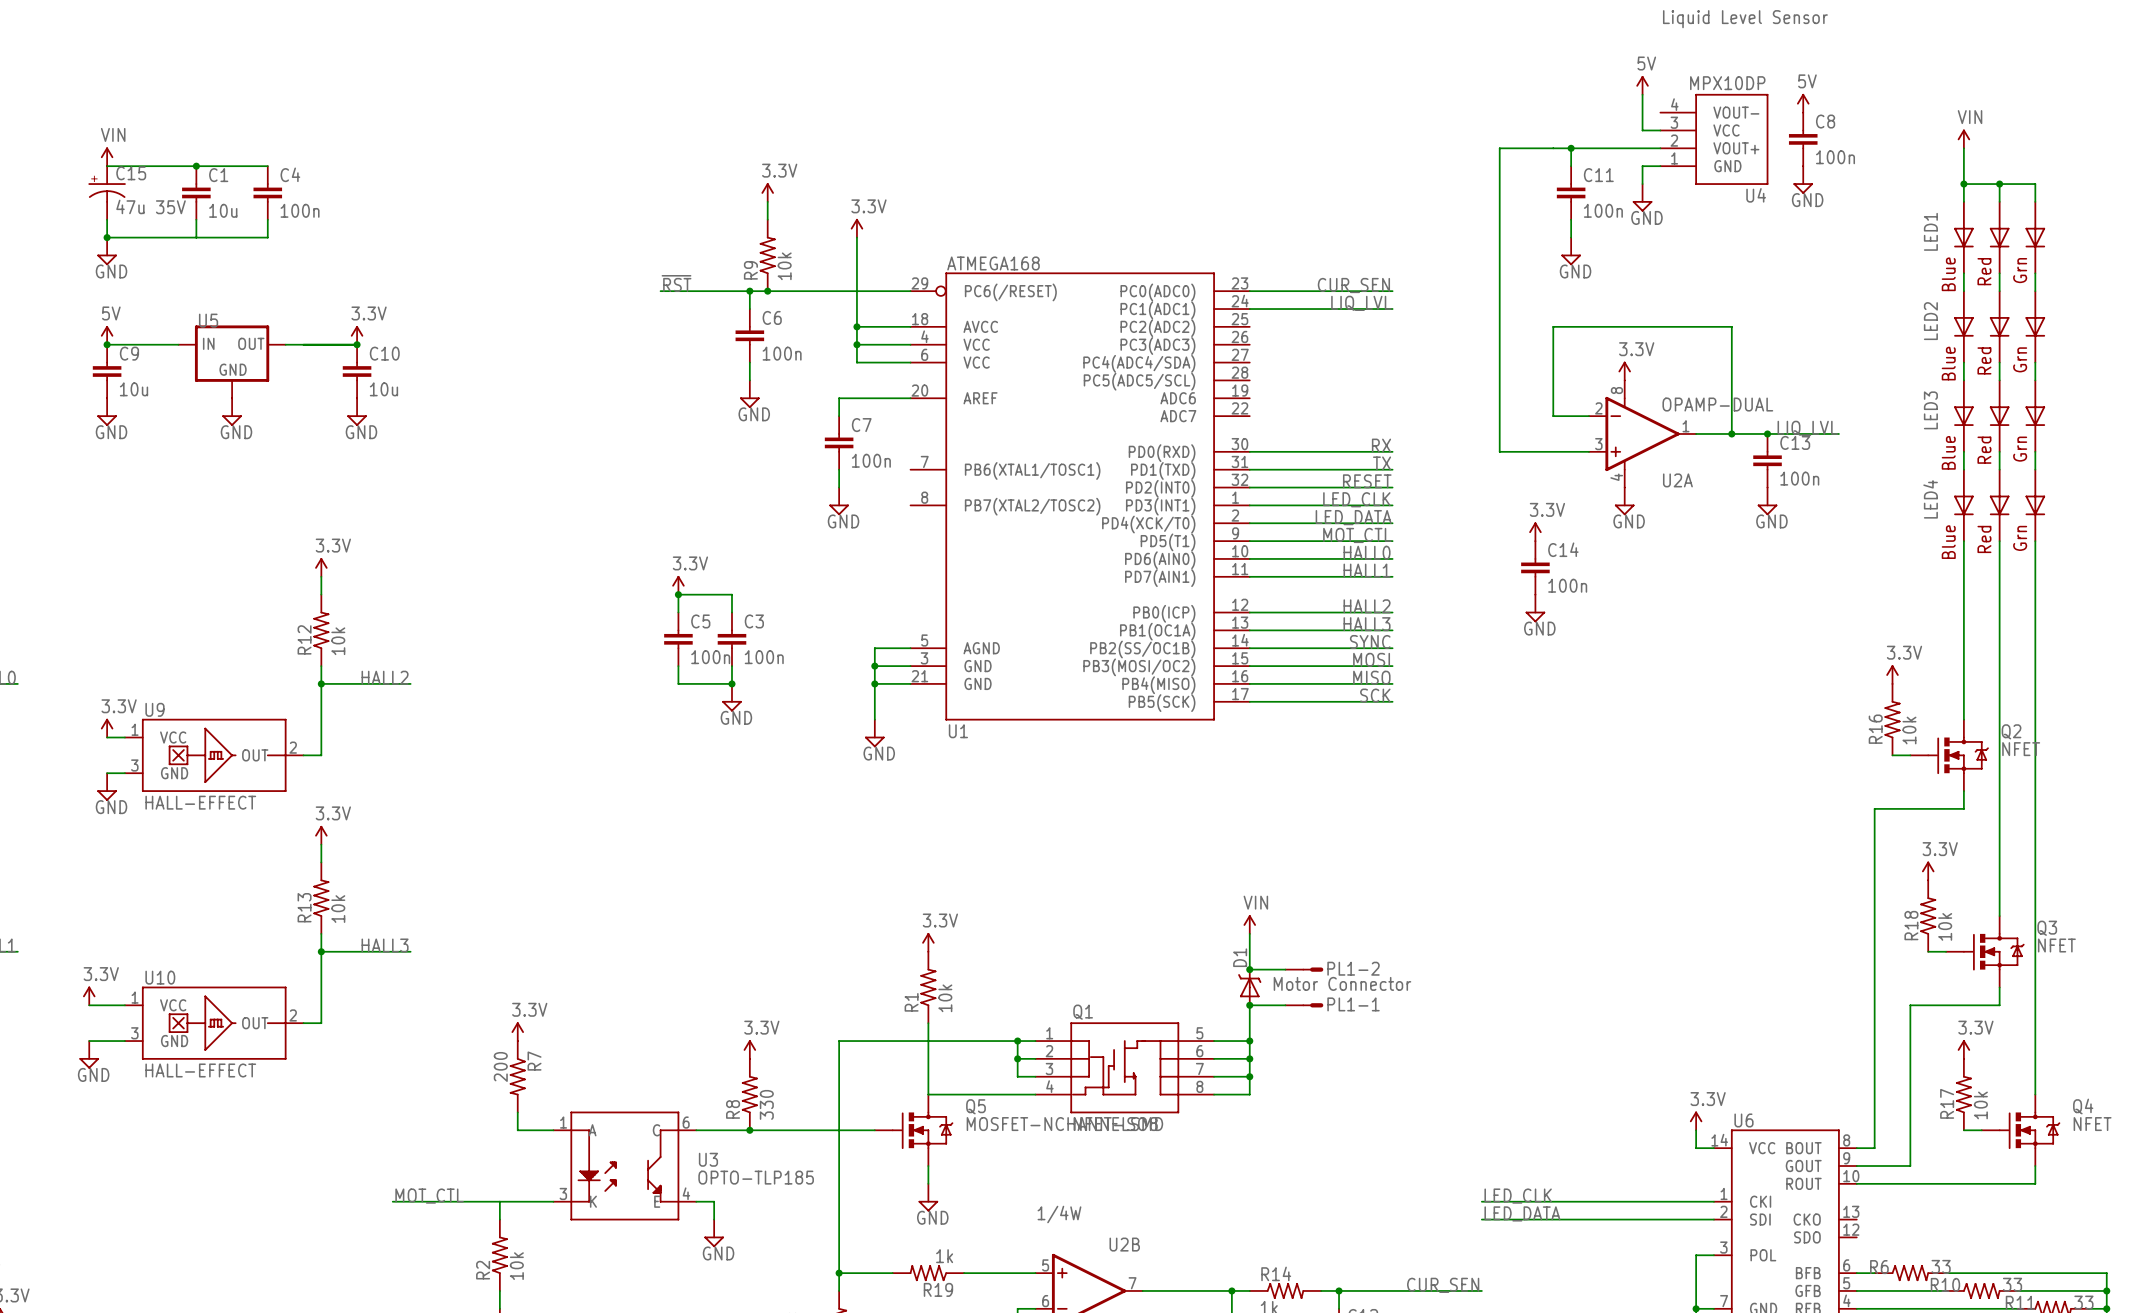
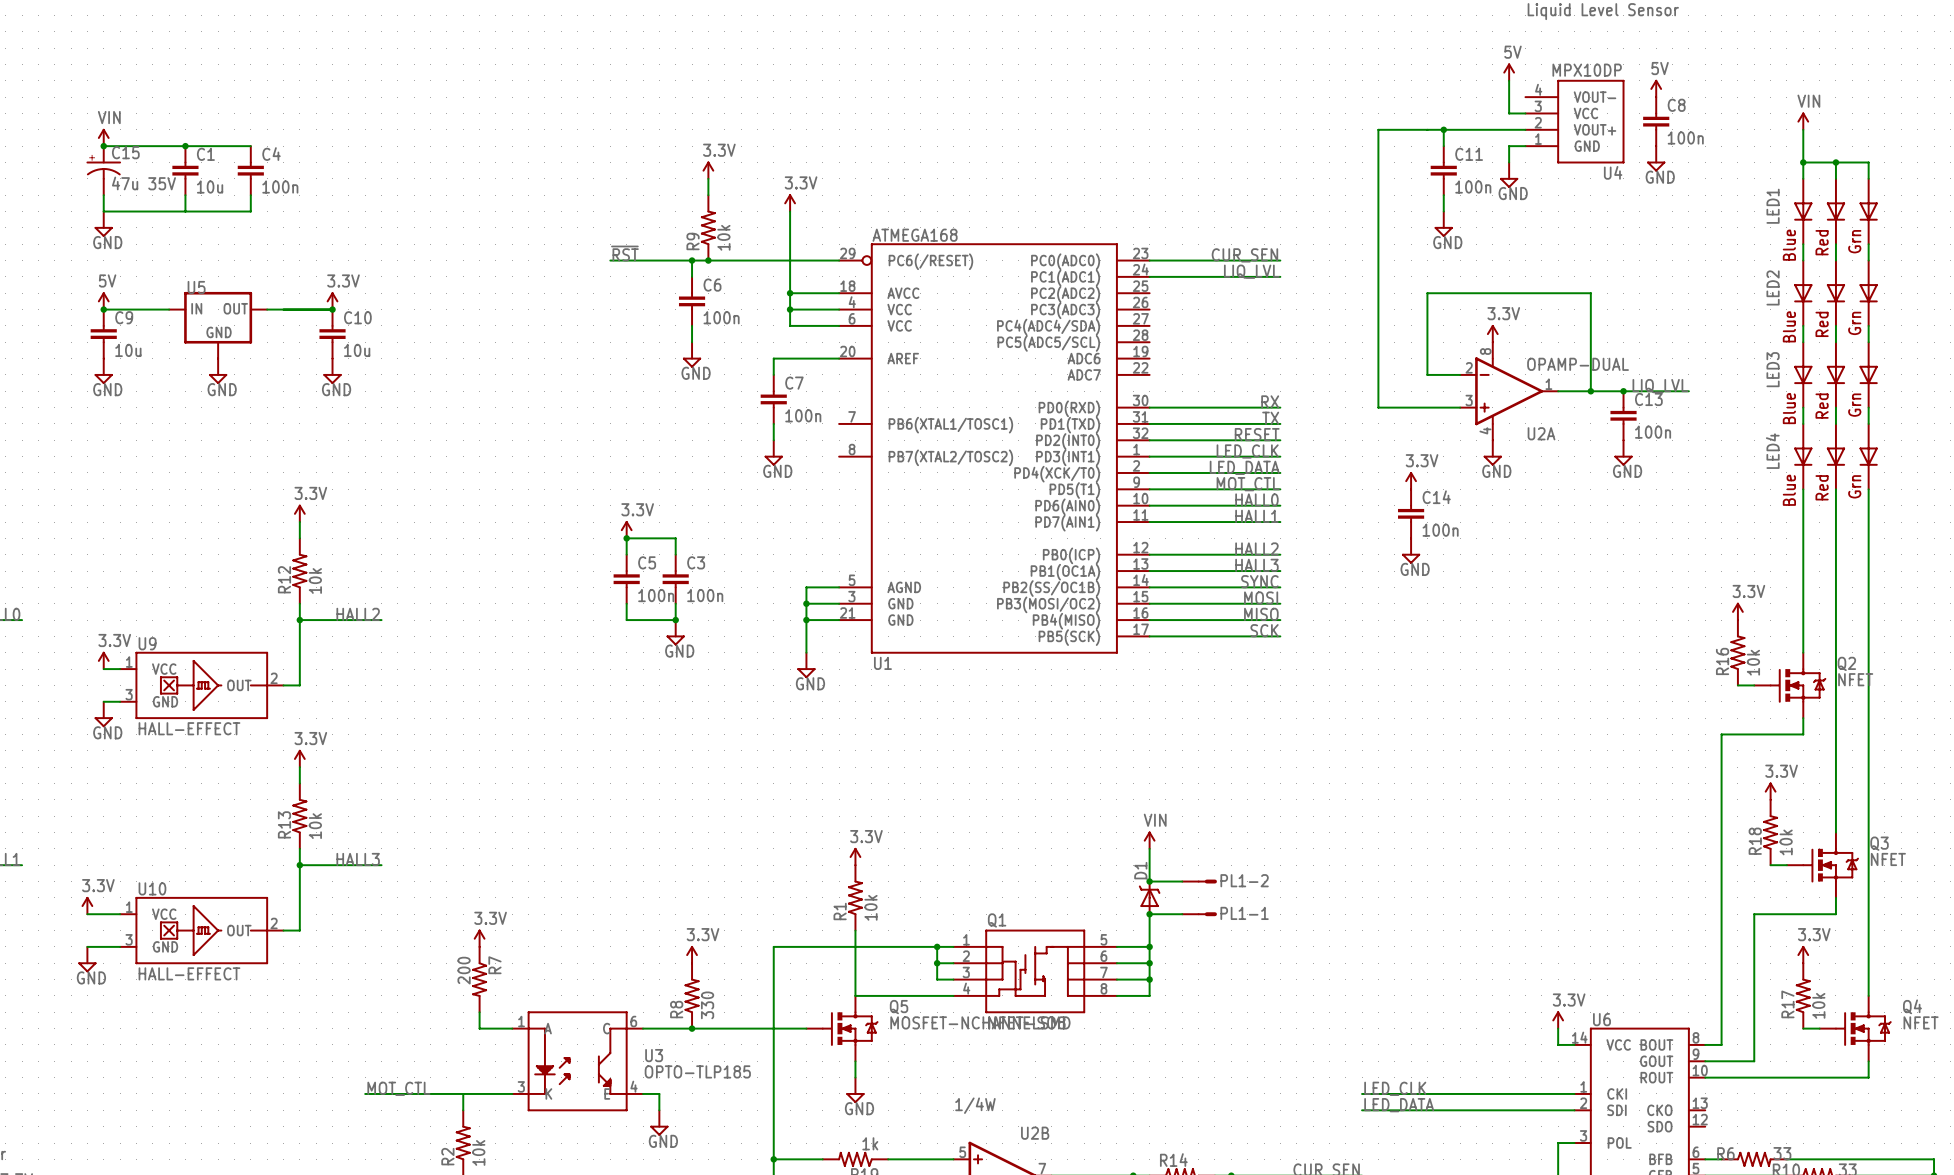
junction: none -> (103, 146)
junction: (107, 237) -> none
PL1-1 value: Motor Connector (1342, 983) -> none

